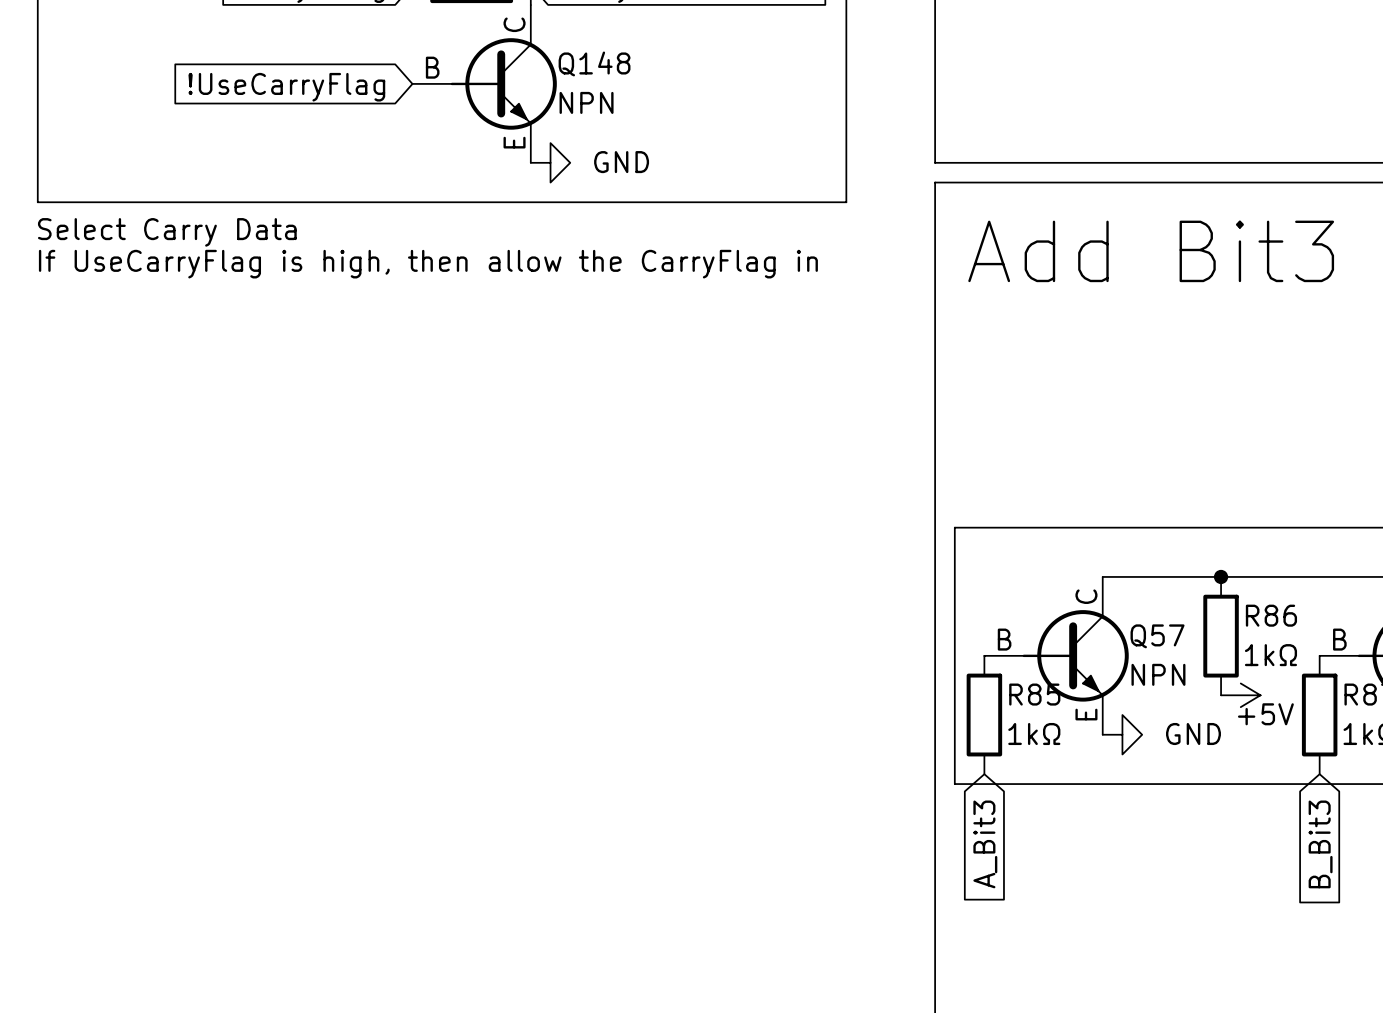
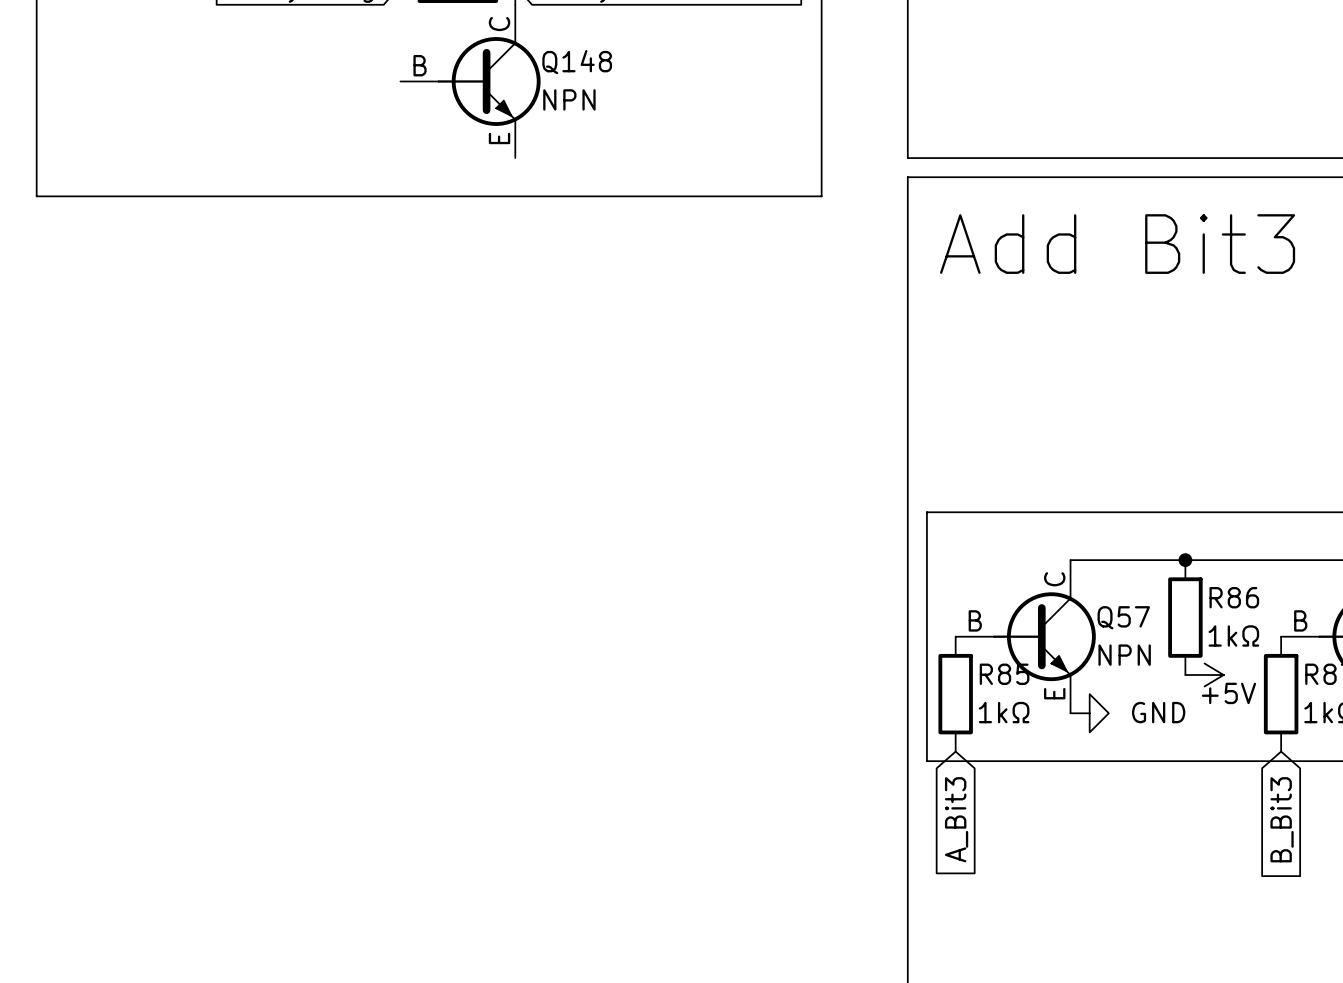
global label: !UseCarryFlag (286, 87) -> none
power symbol: GND (550, 162) -> none
text: Select Carry Data (167, 232) -> none
text: If UseCarryFlag is high, then allow the CarryFlag in (428, 264) -> none

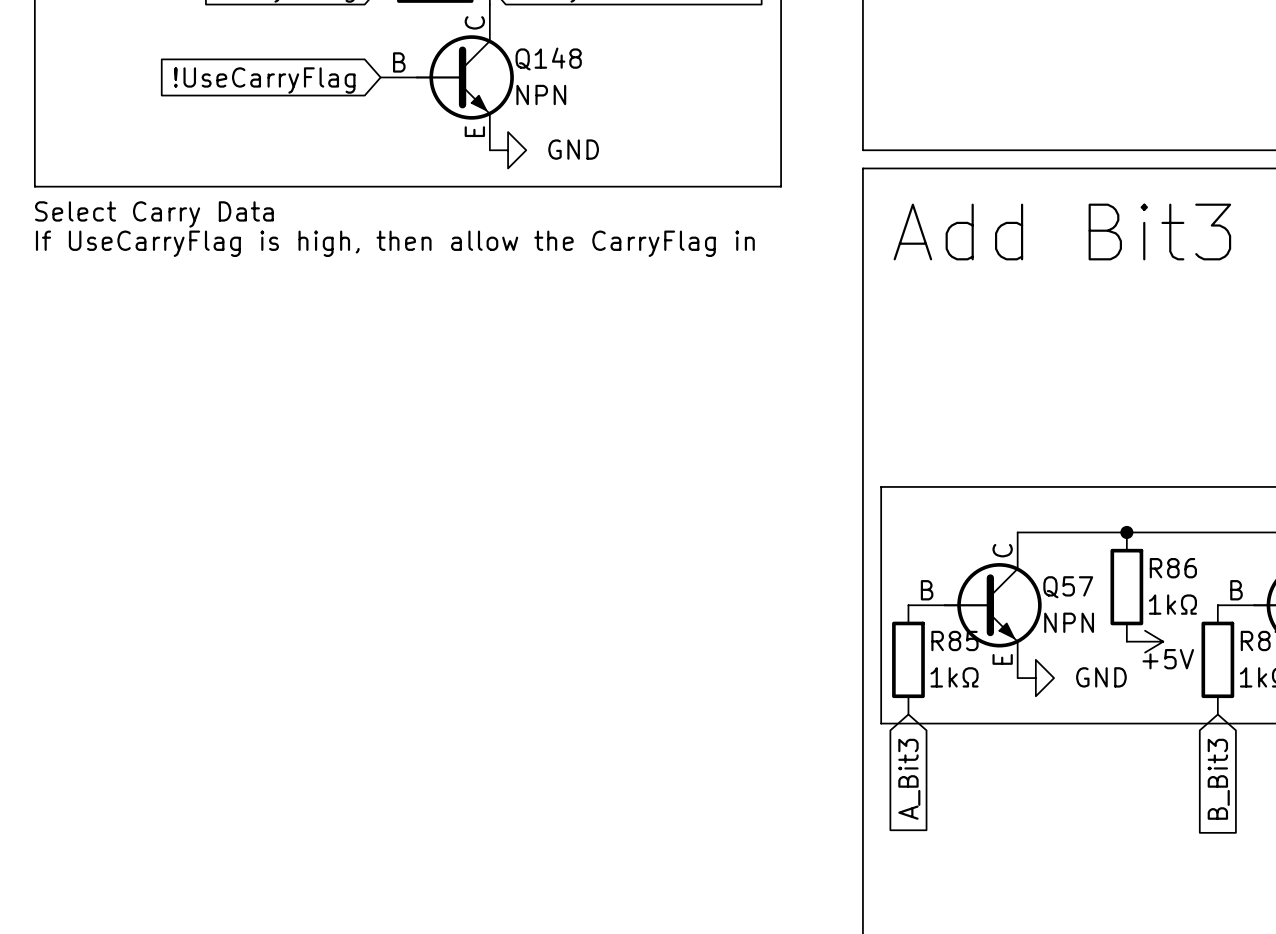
global label: none -> !UseCarryFlag (264, 80)
power symbol: none -> GND (508, 150)
text: none -> Select Carry Data (154, 214)
text: none -> If UseCarryFlag is high, then allow the CarryFlag in (395, 243)

